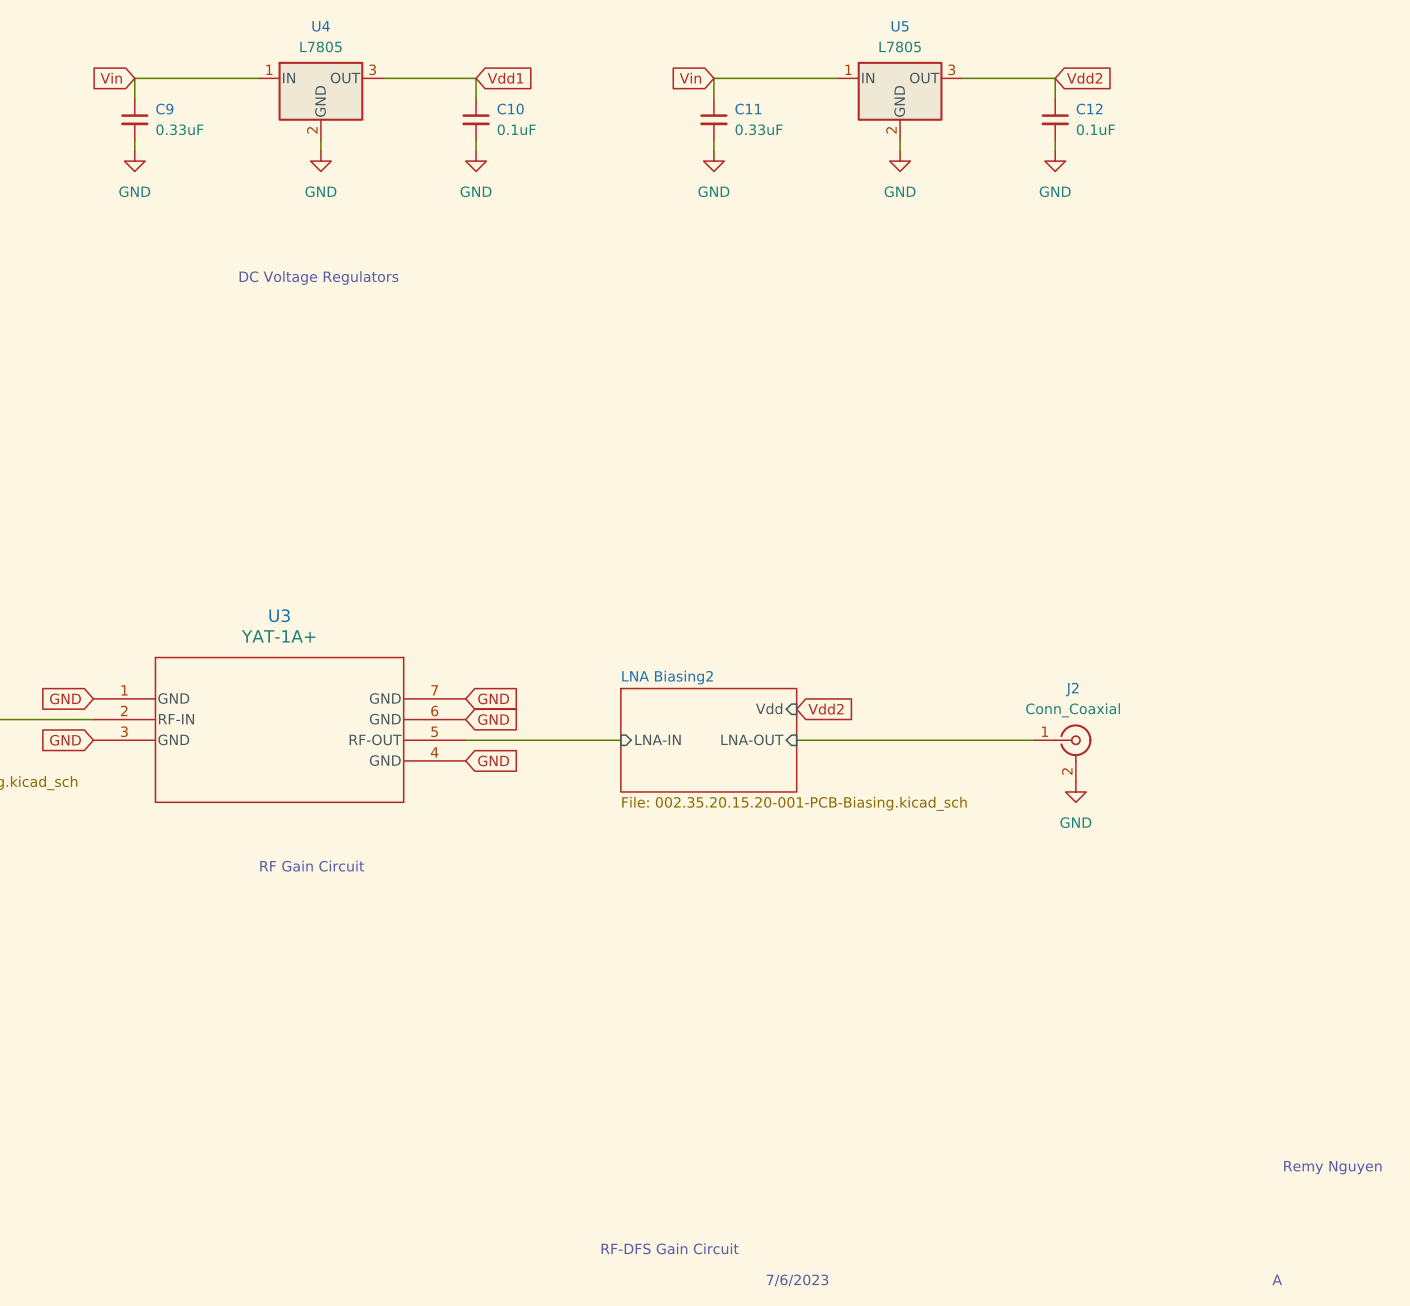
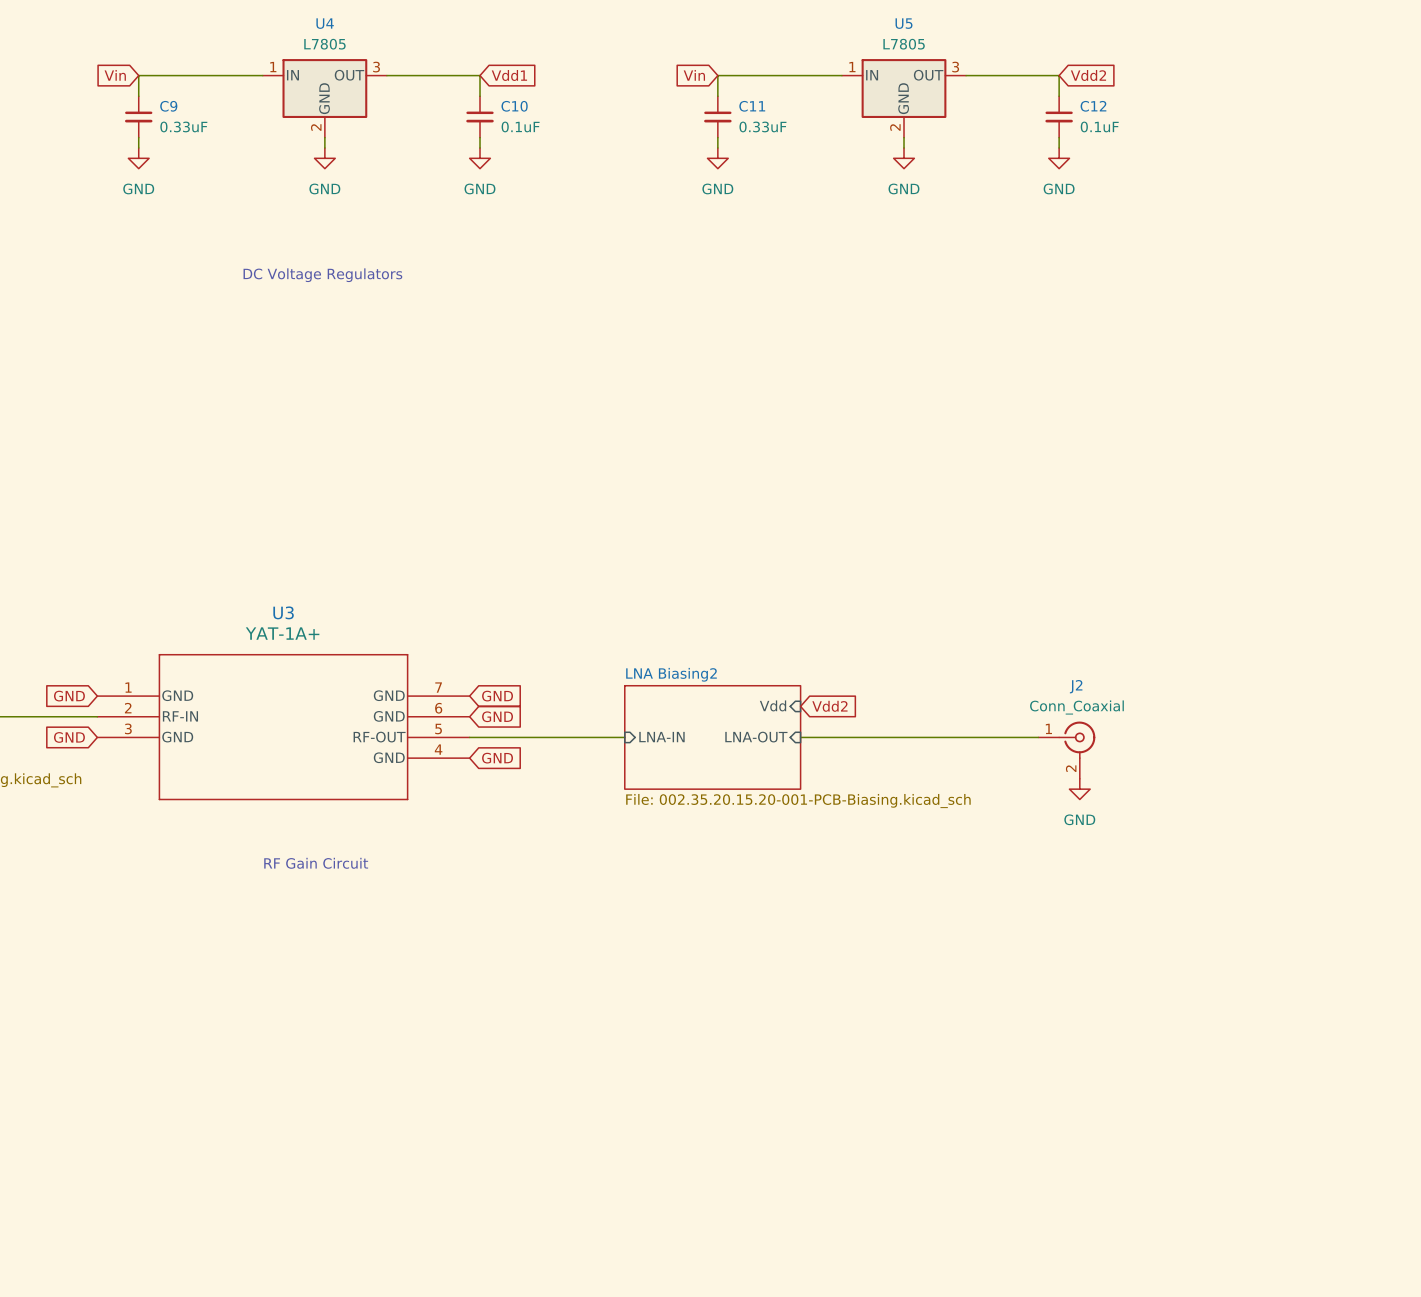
text: Remy Nguyen (1332, 1167) -> none
text: RF-DFS Gain Circuit (670, 1248) -> none
text: A (1277, 1279) -> none
text: 7/6/2023 (797, 1280) -> none

